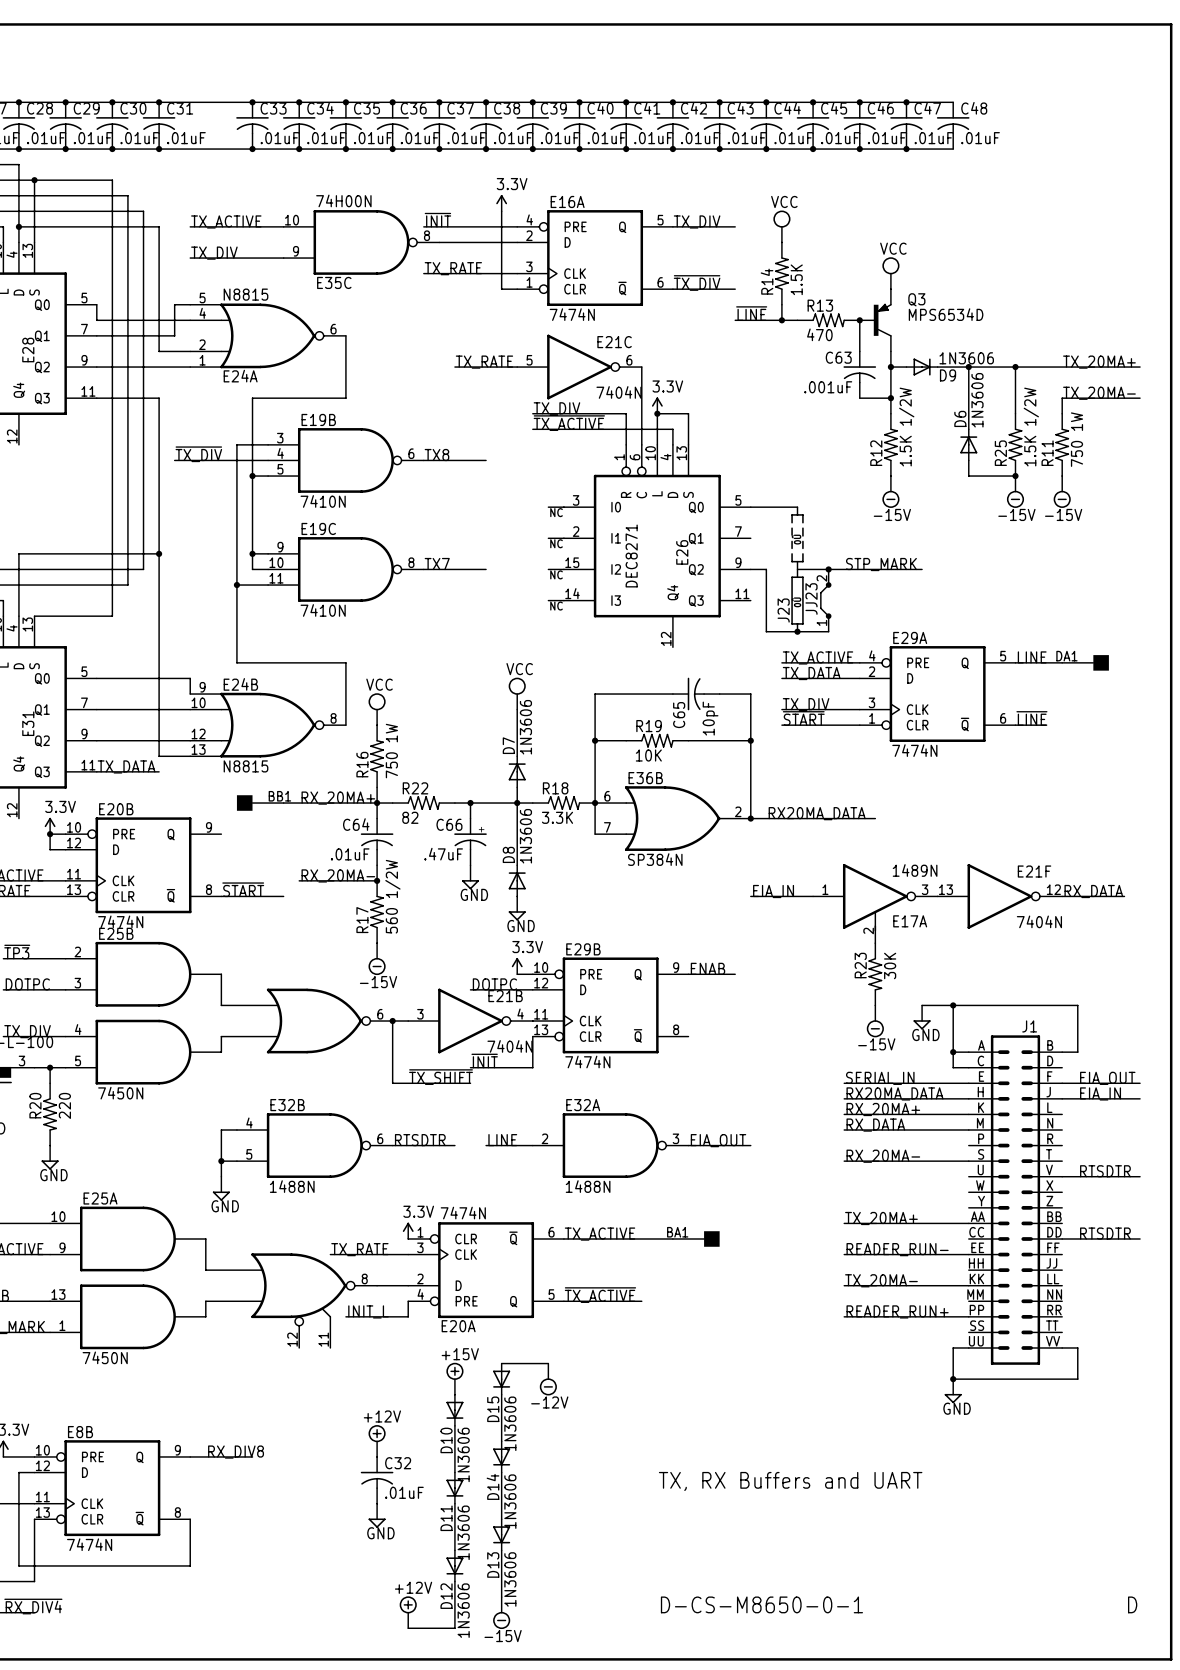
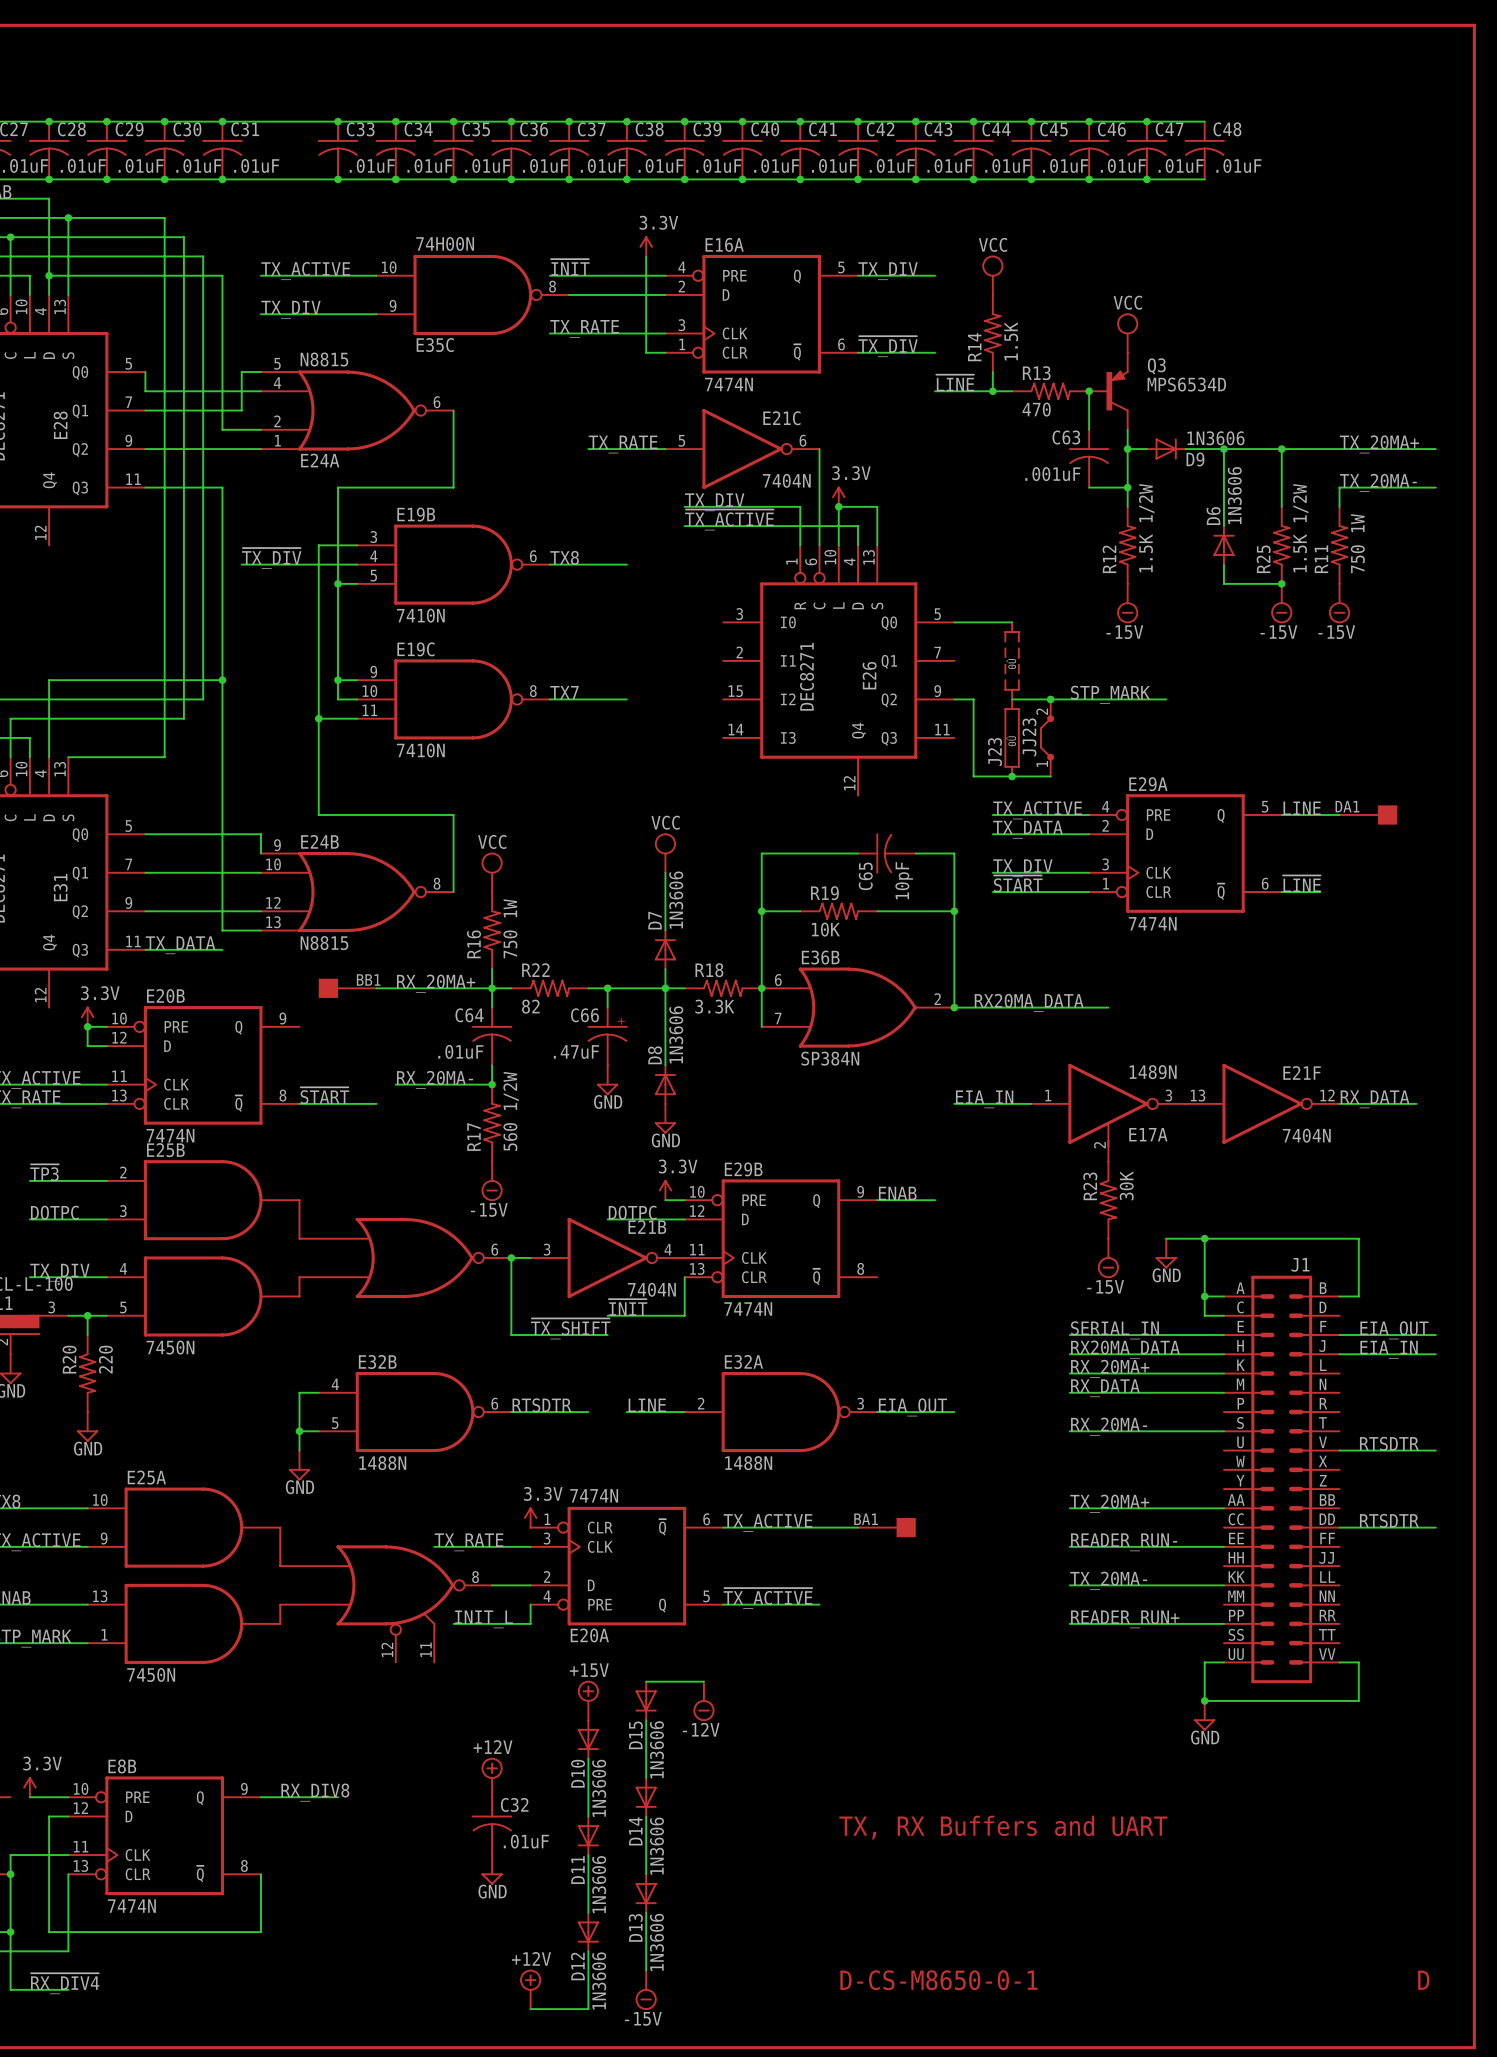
power symbol: (556, 507) -> none
power symbol: (556, 538) -> none
power symbol: (556, 569) -> none
power symbol: (556, 600) -> none

